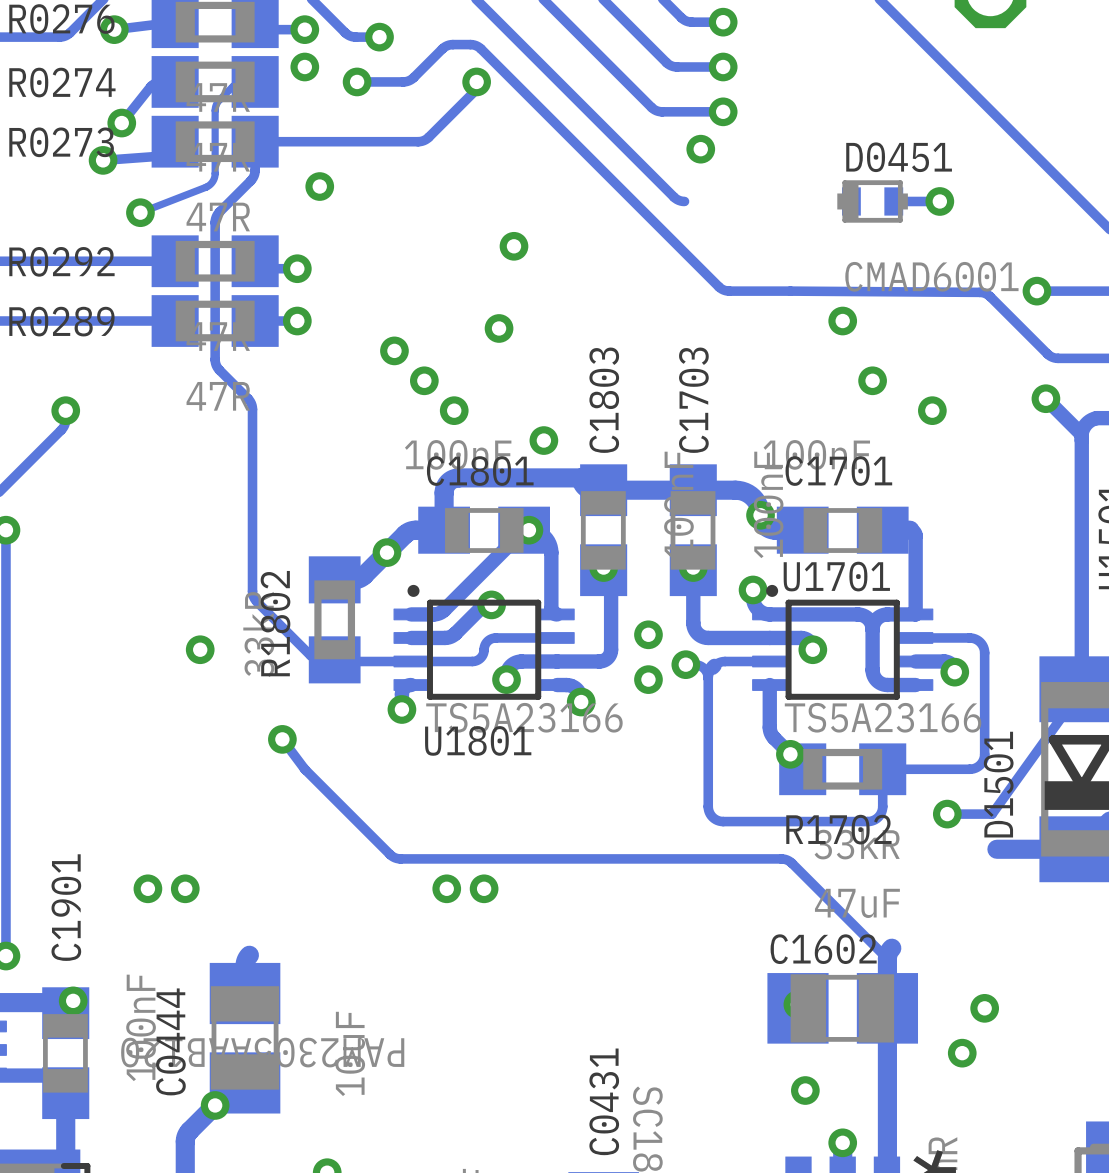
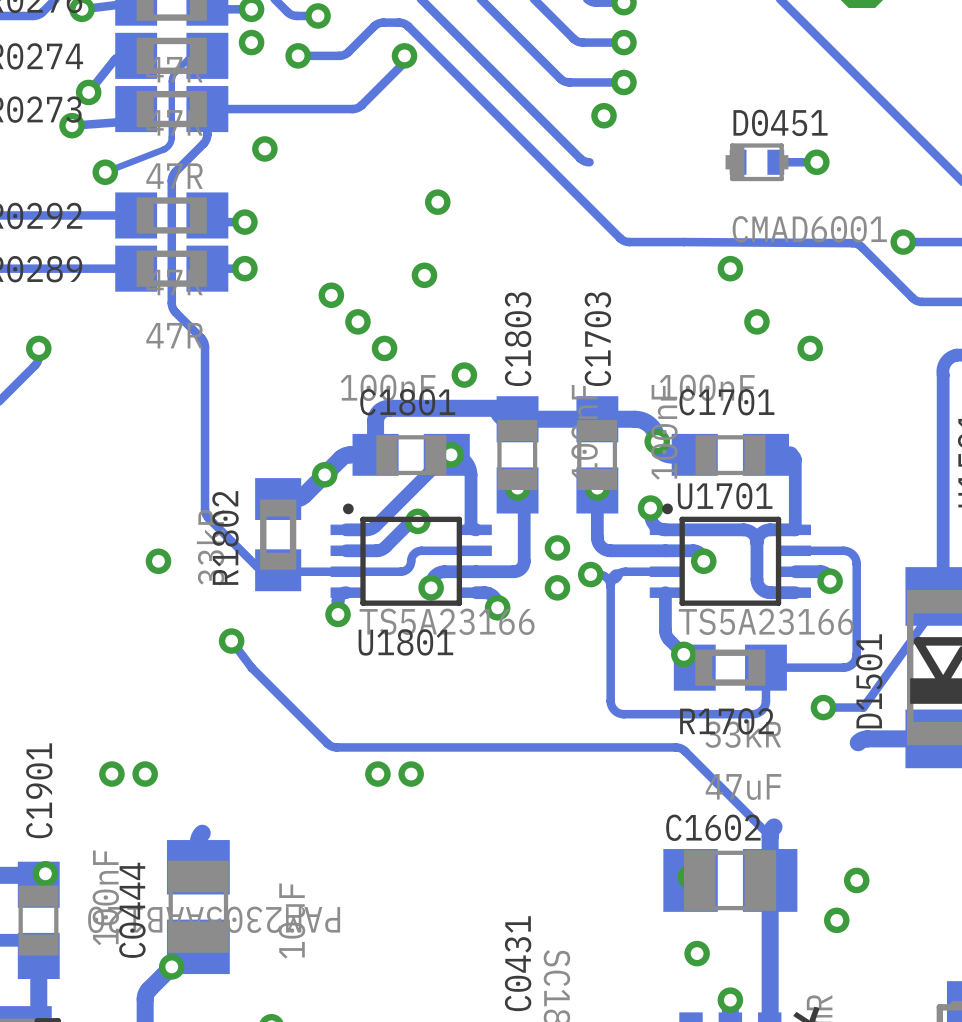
track: (1045, 398) (1081, 434) -> none
via: (1045, 398) -> none
track: none -> (867, 738) (858, 742)

